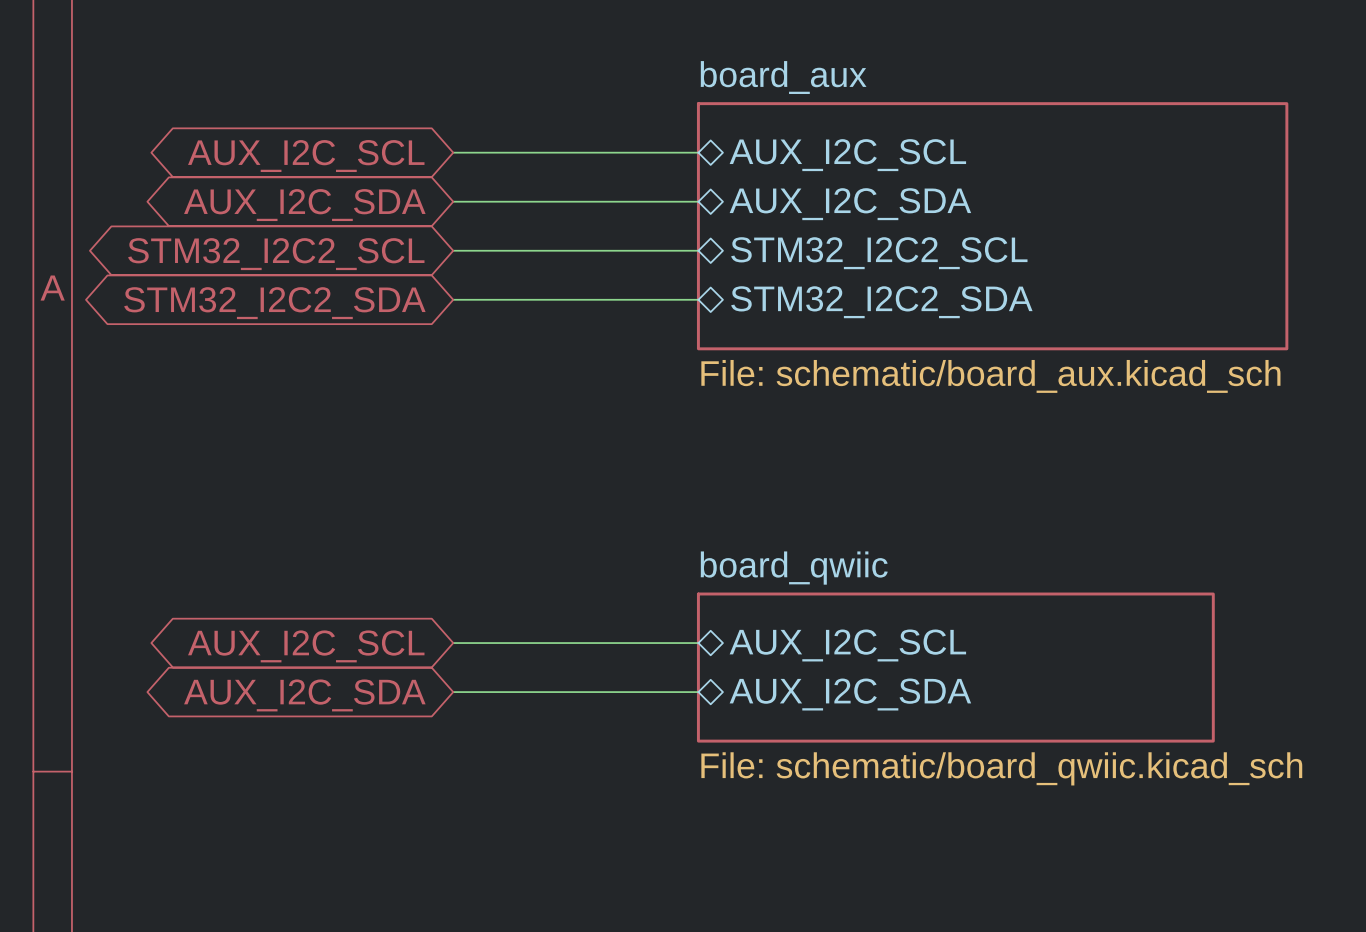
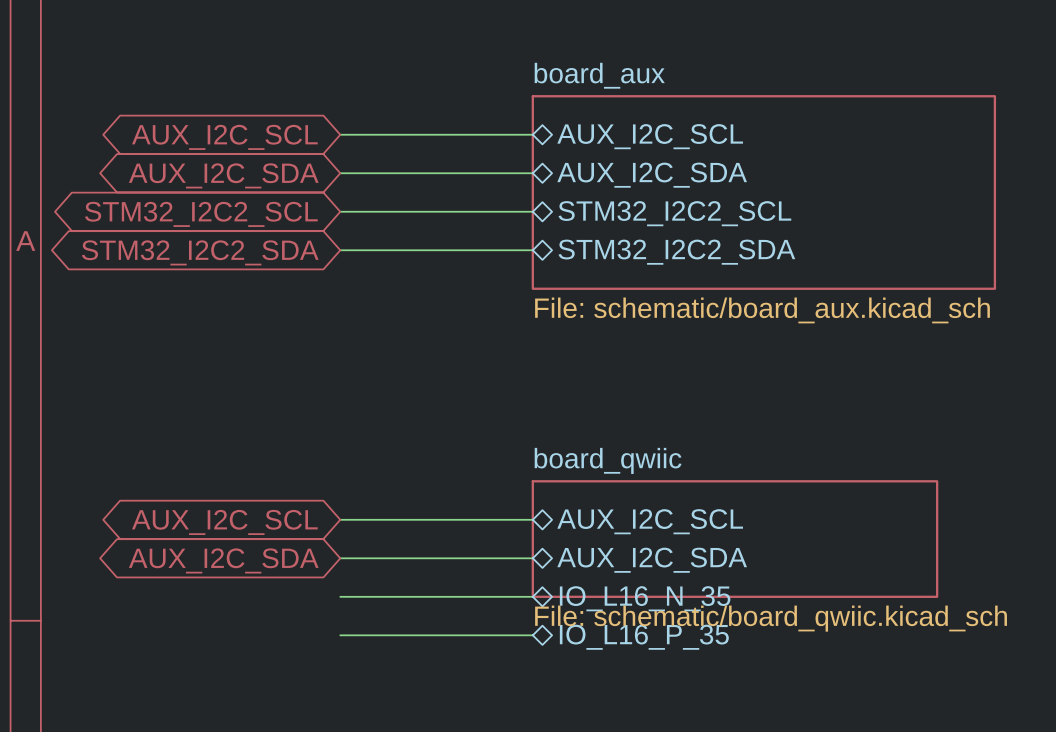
wire: none -> (340, 596) (532, 596)
sheet pin: none -> IO_L16_N_35 (645, 598)
wire: none -> (340, 635) (532, 635)
sheet pin: none -> IO_L16_P_35 (644, 637)

